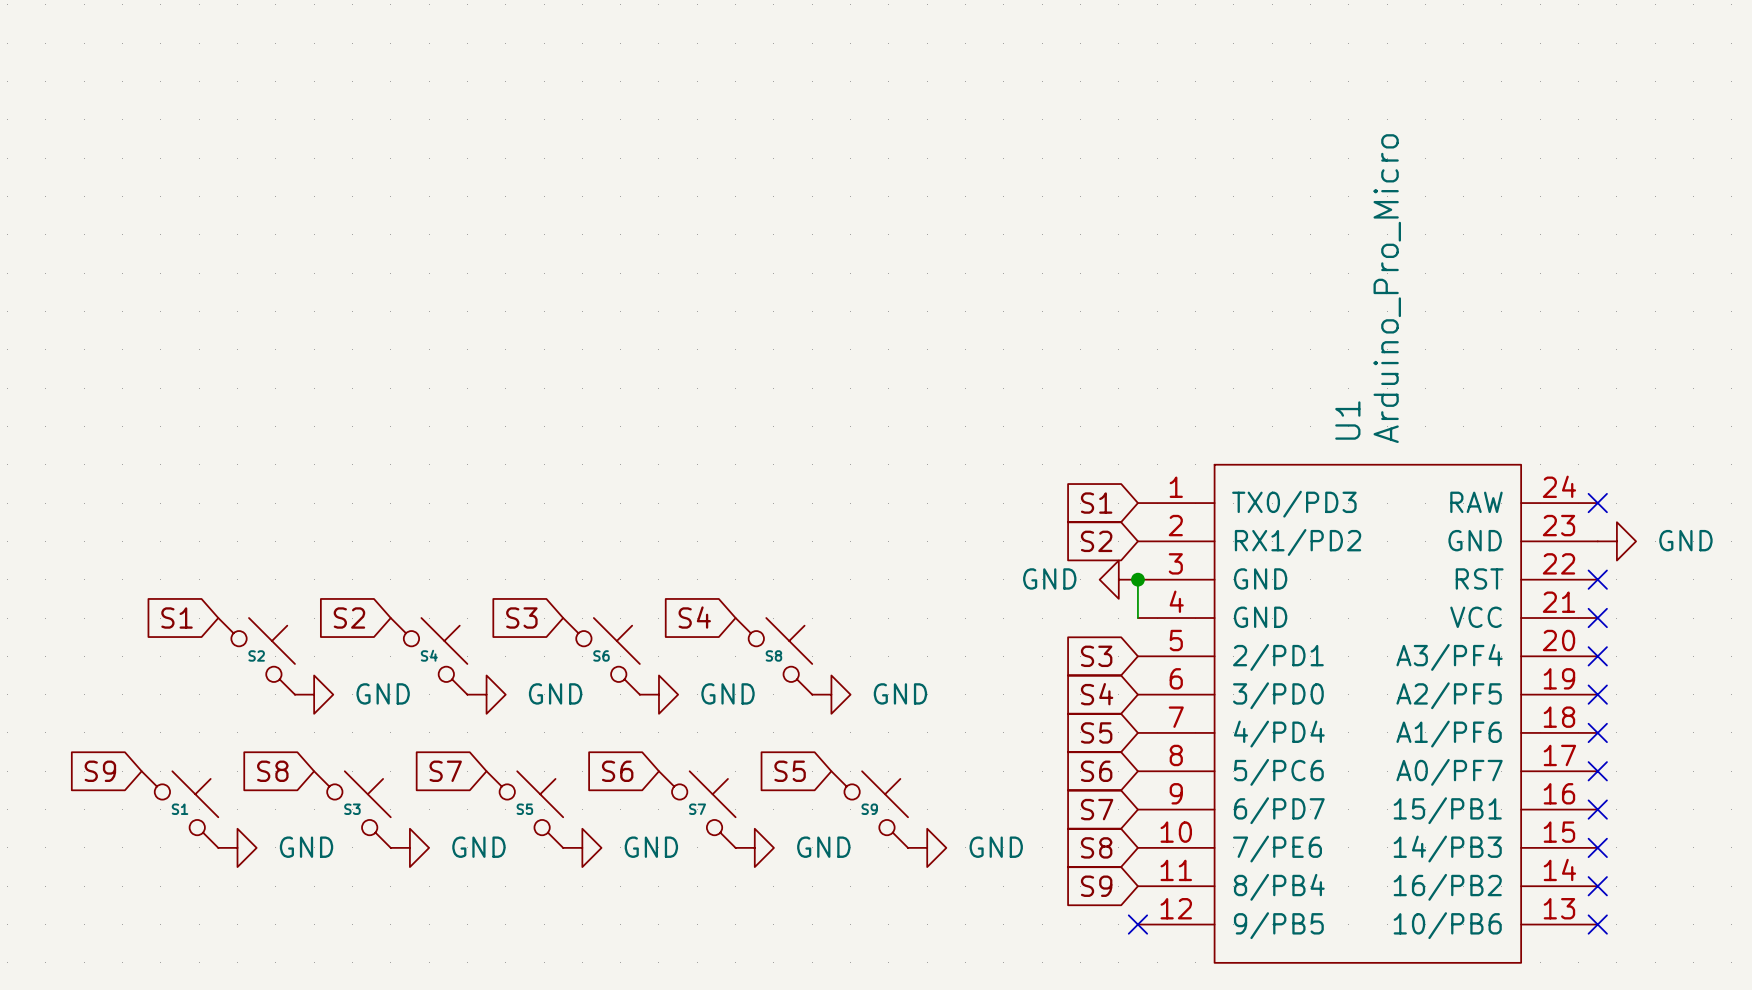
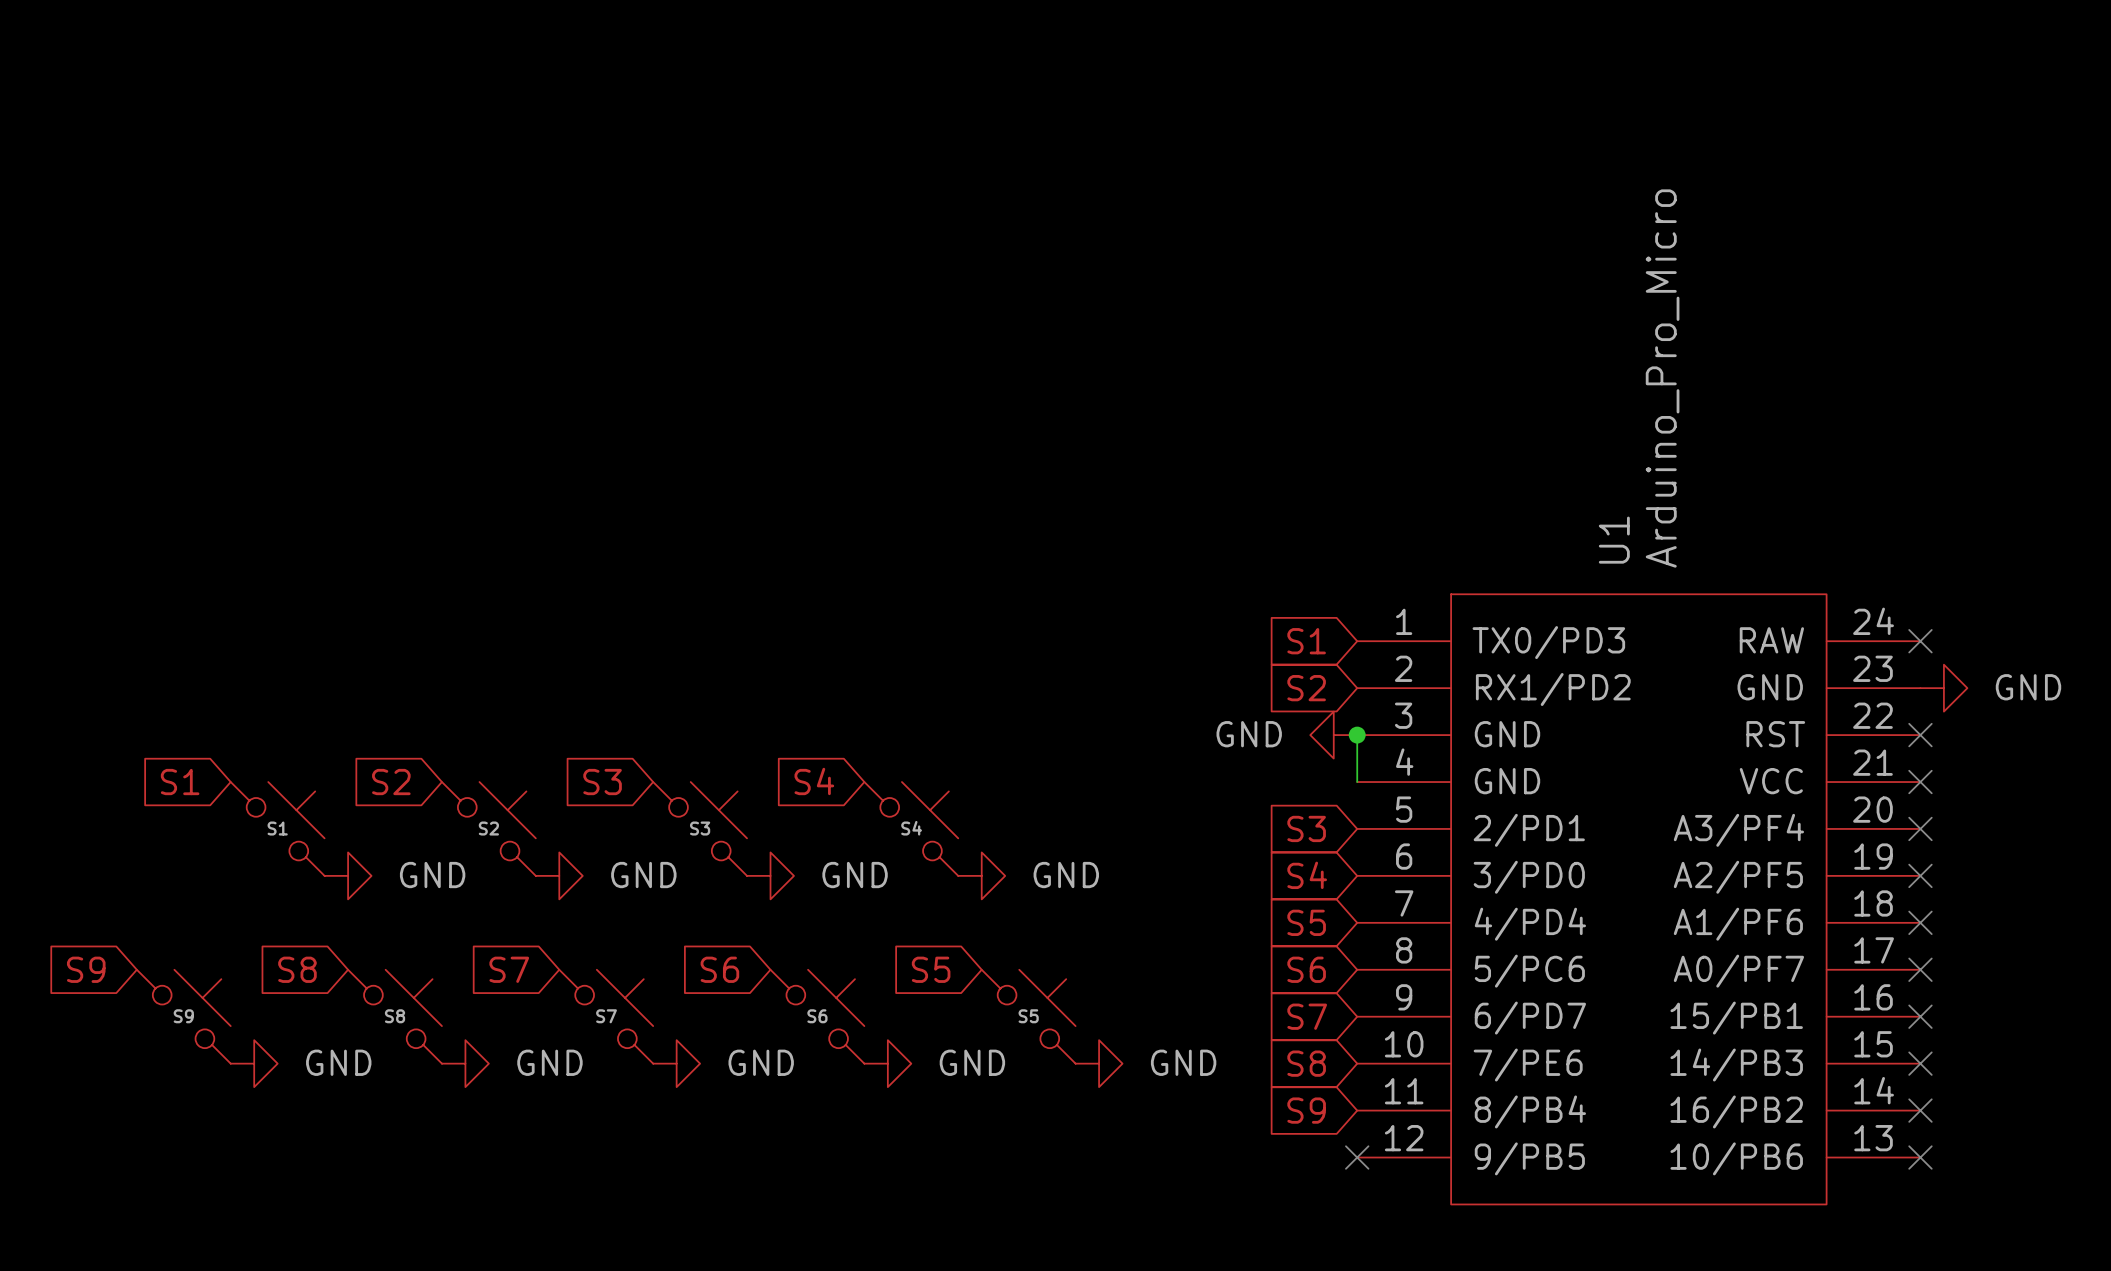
S2 name: S2 (256, 655) -> S1 (277, 828)
S4 name: S4 (429, 655) -> S2 (488, 828)
S6 name: S6 (601, 655) -> S3 (700, 828)
S8 name: S8 (773, 655) -> S4 (911, 828)
S1 name: S1 (180, 809) -> S9 (183, 1016)
S3 name: S3 (352, 809) -> S8 (395, 1016)
S5 name: S5 (524, 809) -> S7 (606, 1016)
S7 name: S7 (697, 809) -> S6 (817, 1016)
S9 name: S9 (869, 809) -> S5 (1028, 1016)

